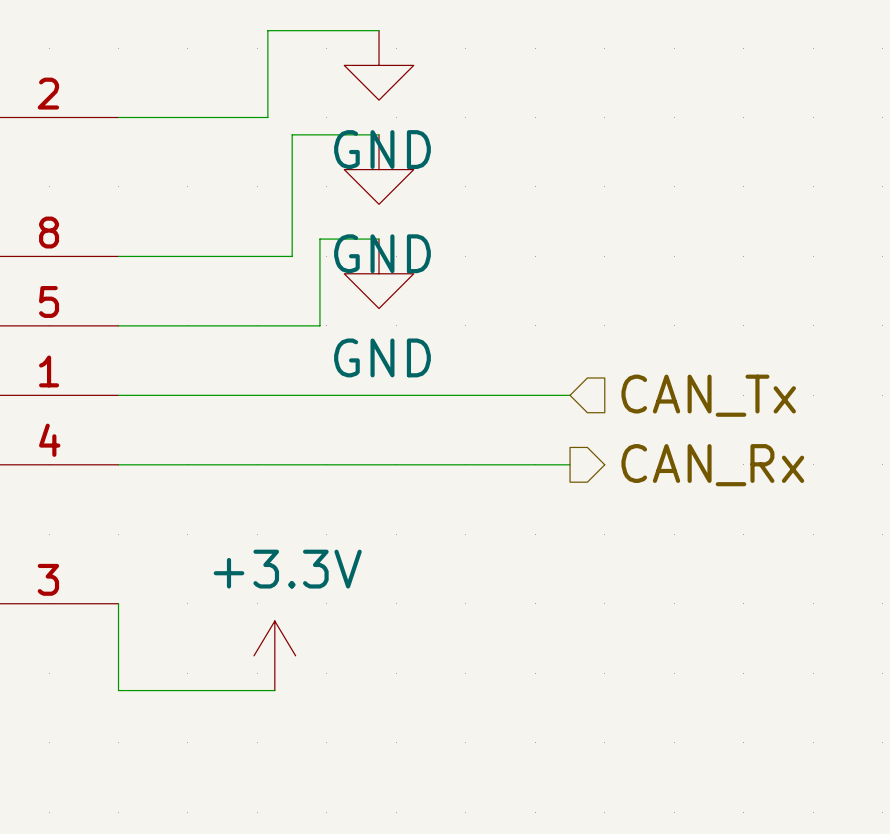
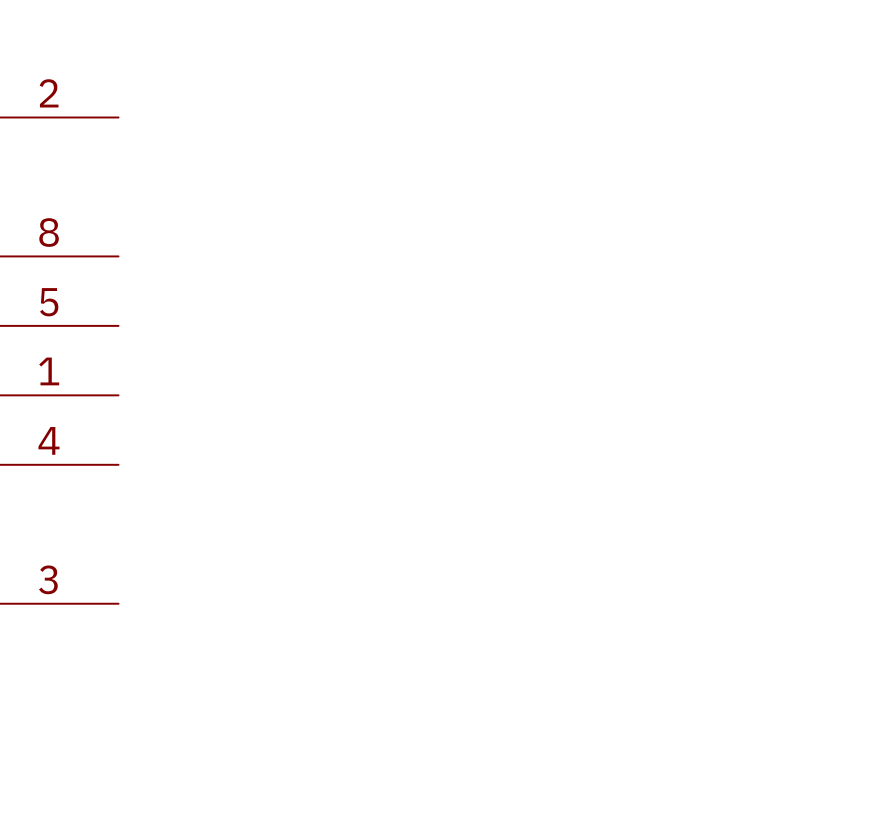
wire: (379, 30) (267, 30) (267, 117) (118, 117) -> none
power symbol: GND (379, 65) -> none
wire: (379, 134) (292, 134) (292, 256) (118, 256) -> none
power symbol: GND (379, 169) -> none
wire: (379, 239) (319, 239) (319, 325) (118, 325) -> none
power symbol: GND (379, 273) -> none
wire: (118, 395) (570, 395) -> none
hierarchical label: CAN_Tx (708, 395) -> none
wire: (118, 464) (570, 464) -> none
hierarchical label: CAN_Rx (712, 465) -> none
wire: (118, 603) (118, 690) (274, 690) -> none
power symbol: +3.3V (274, 655) -> none

